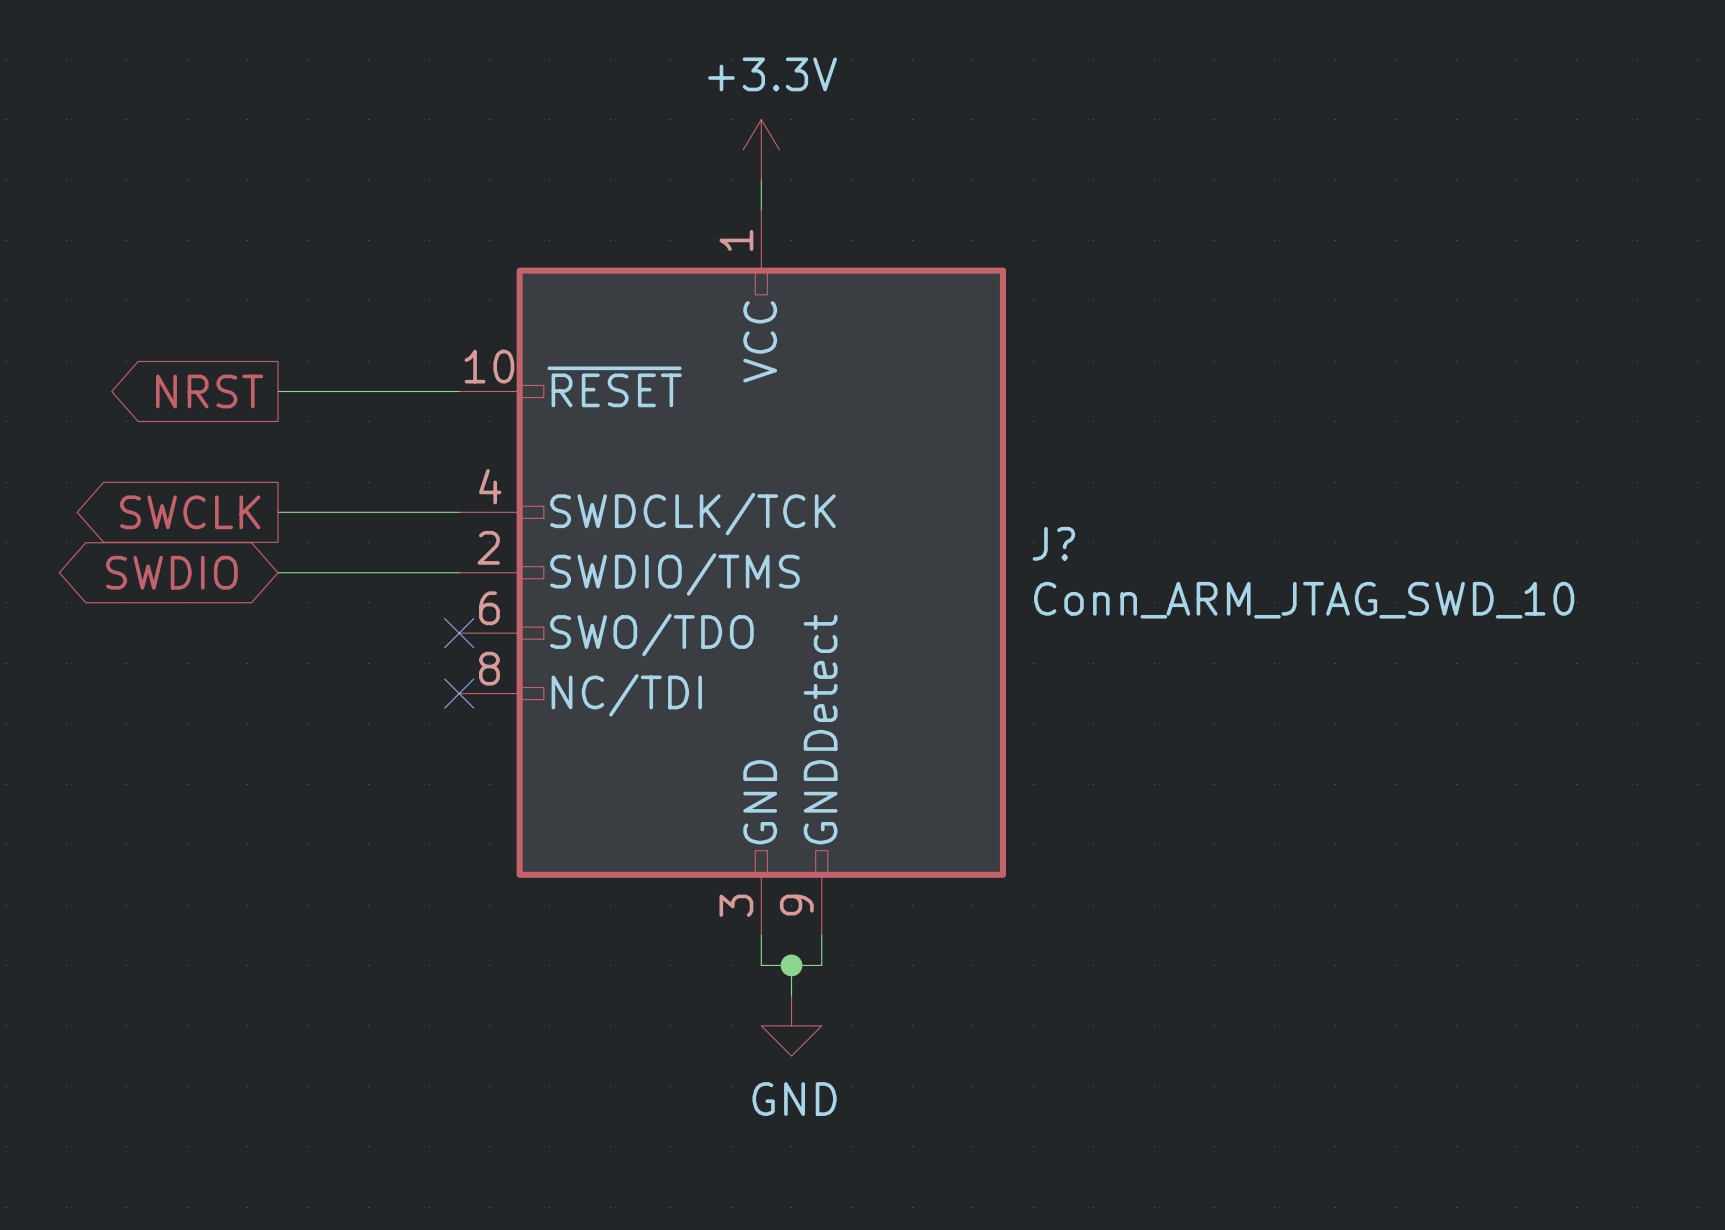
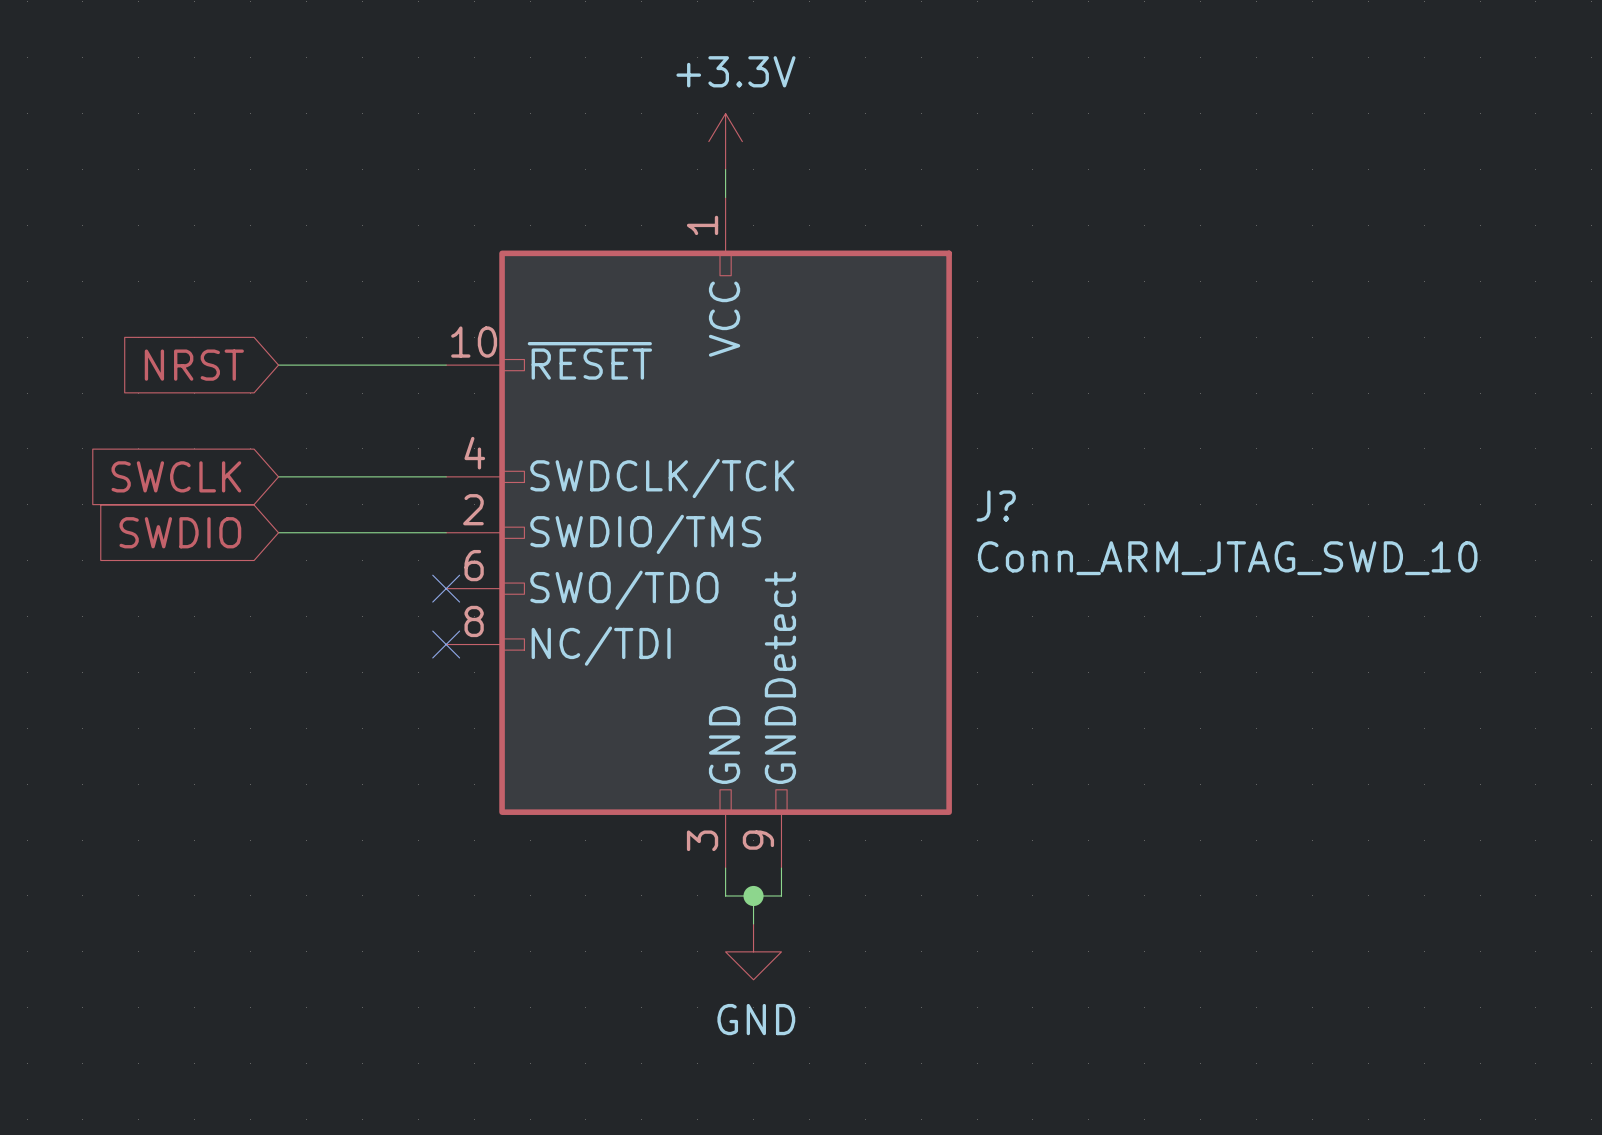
global label shape: output (209, 391) -> input (194, 365)
global label shape: output (190, 512) -> input (176, 476)
global label shape: bidirectional (171, 572) -> input (180, 532)

